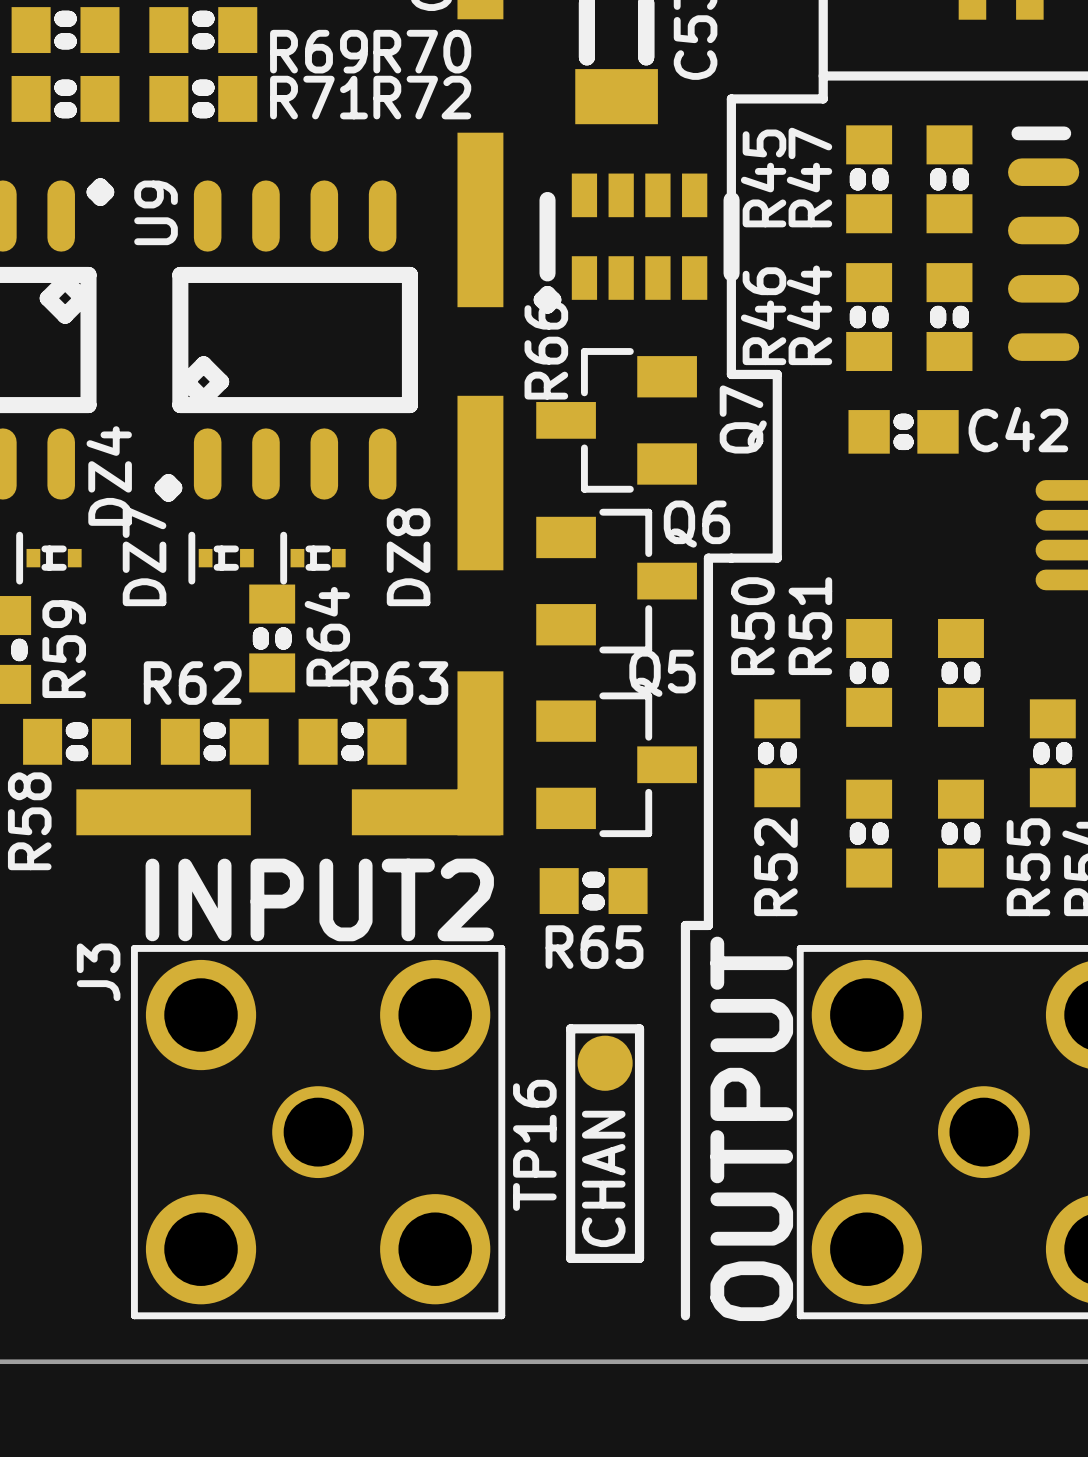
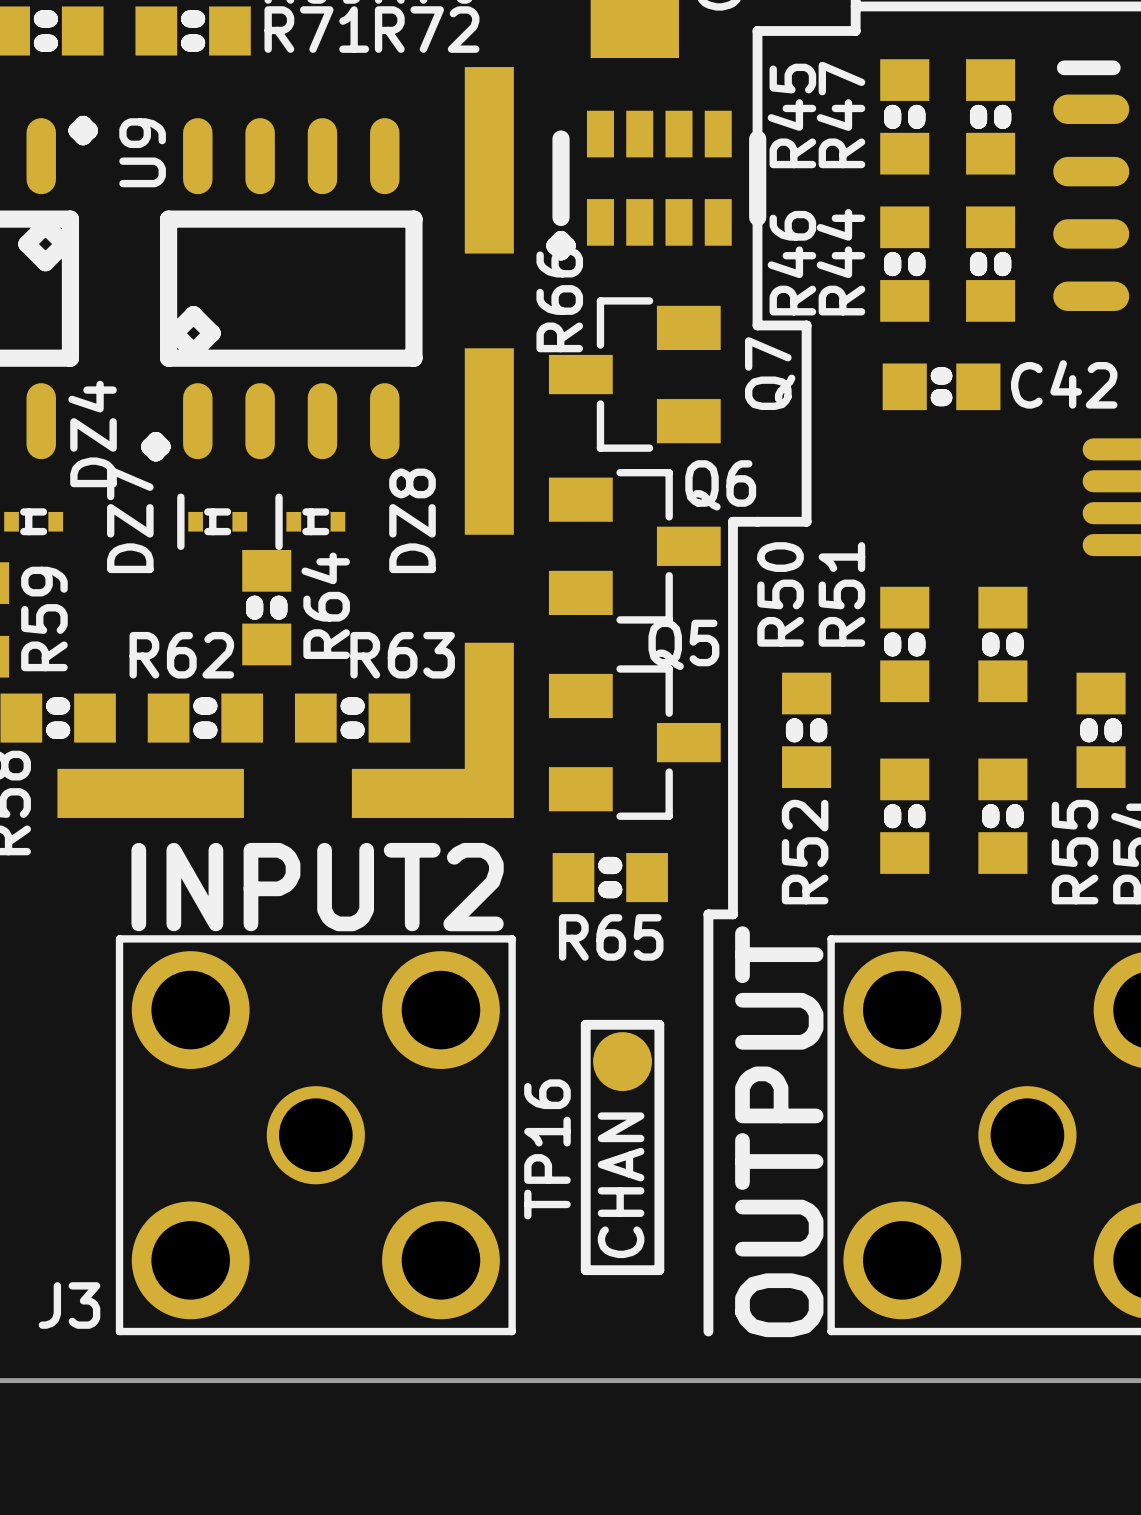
J3 name rotation: 0° (98, 972) -> 90° clockwise (69, 1305)
J3 name position: J3 (98, 972) -> J3 (69, 1305)

